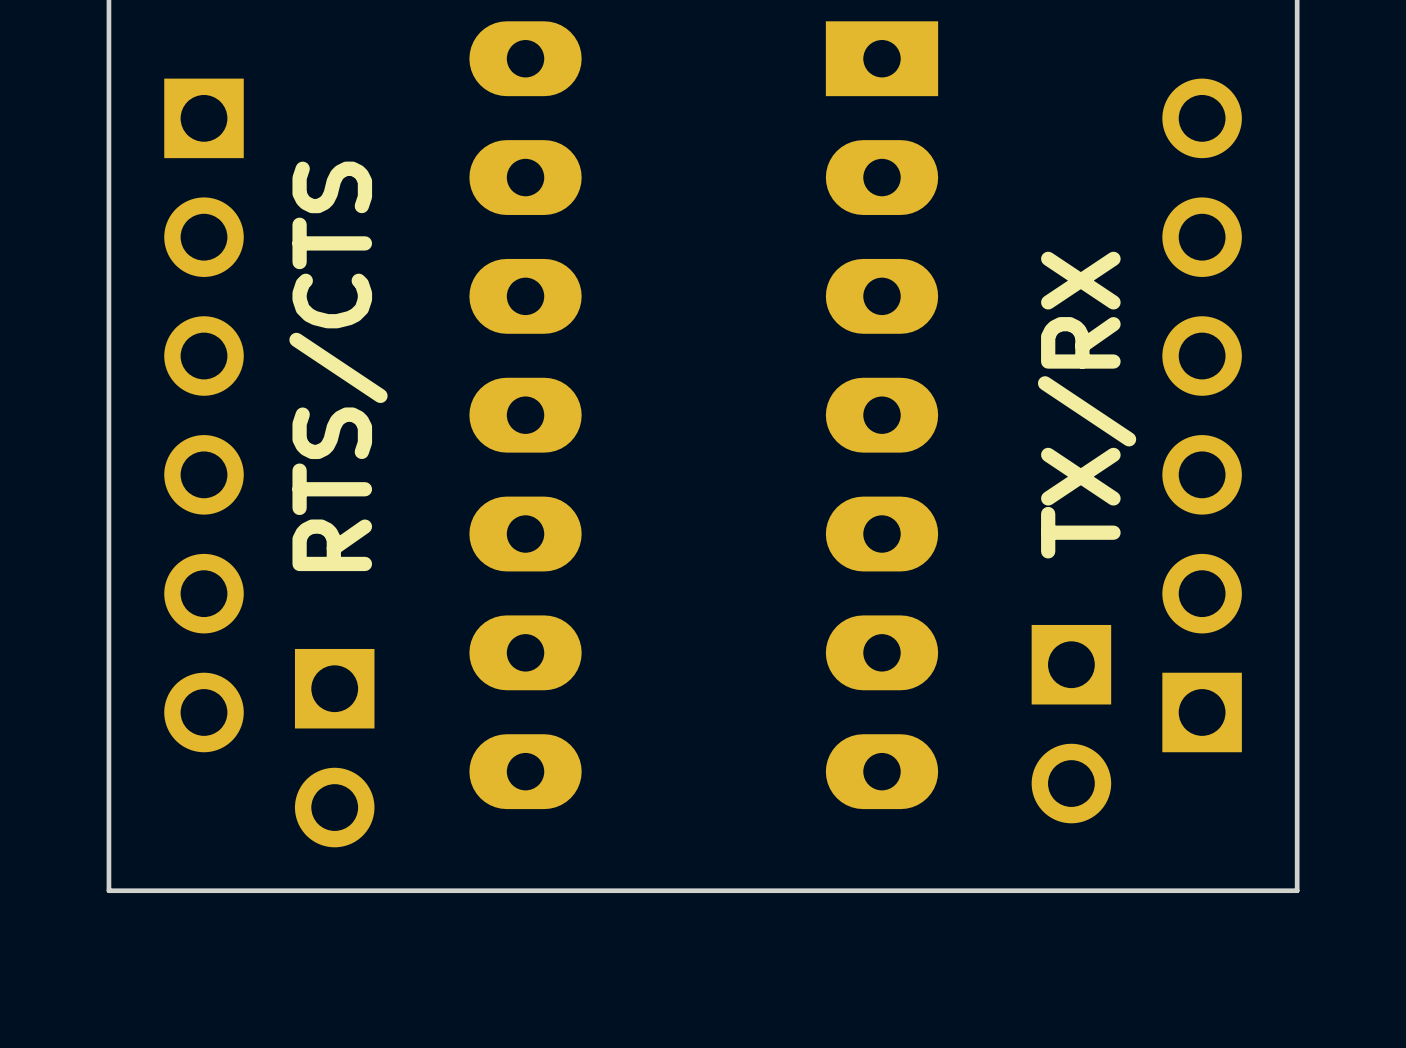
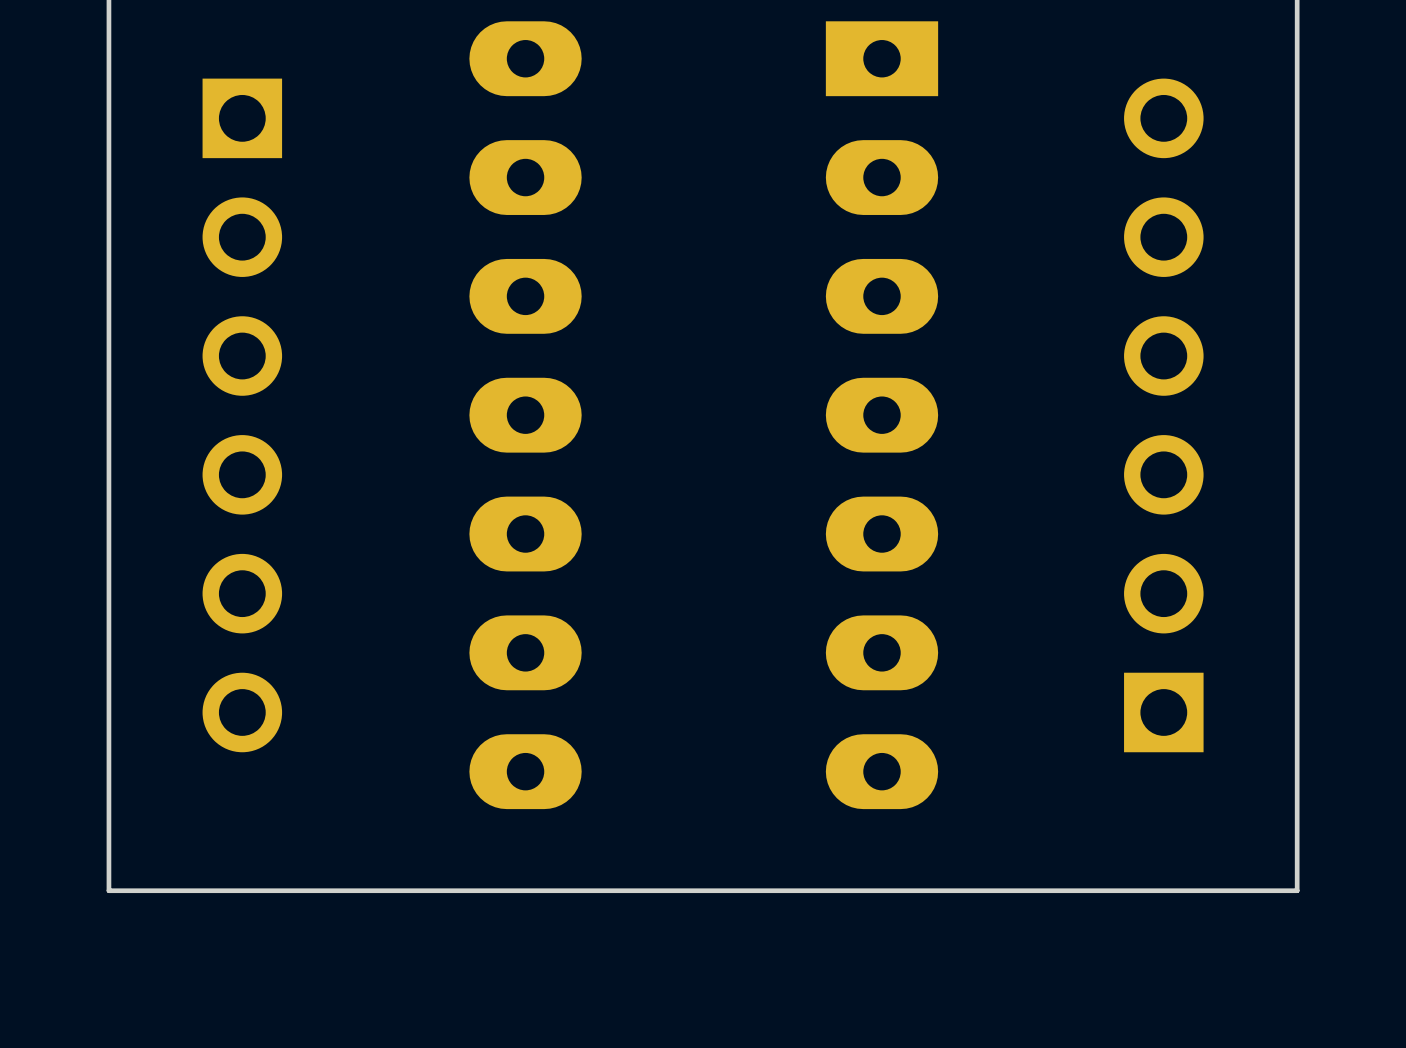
text: RTS/CTS (338, 366) -> none
text: TX/RX (1087, 405) -> none
part position: (204, 415) -> (242, 415)
part position: (1202, 415) -> (1163, 415)
part: (1071, 724) -> none
part: (334, 748) -> none

